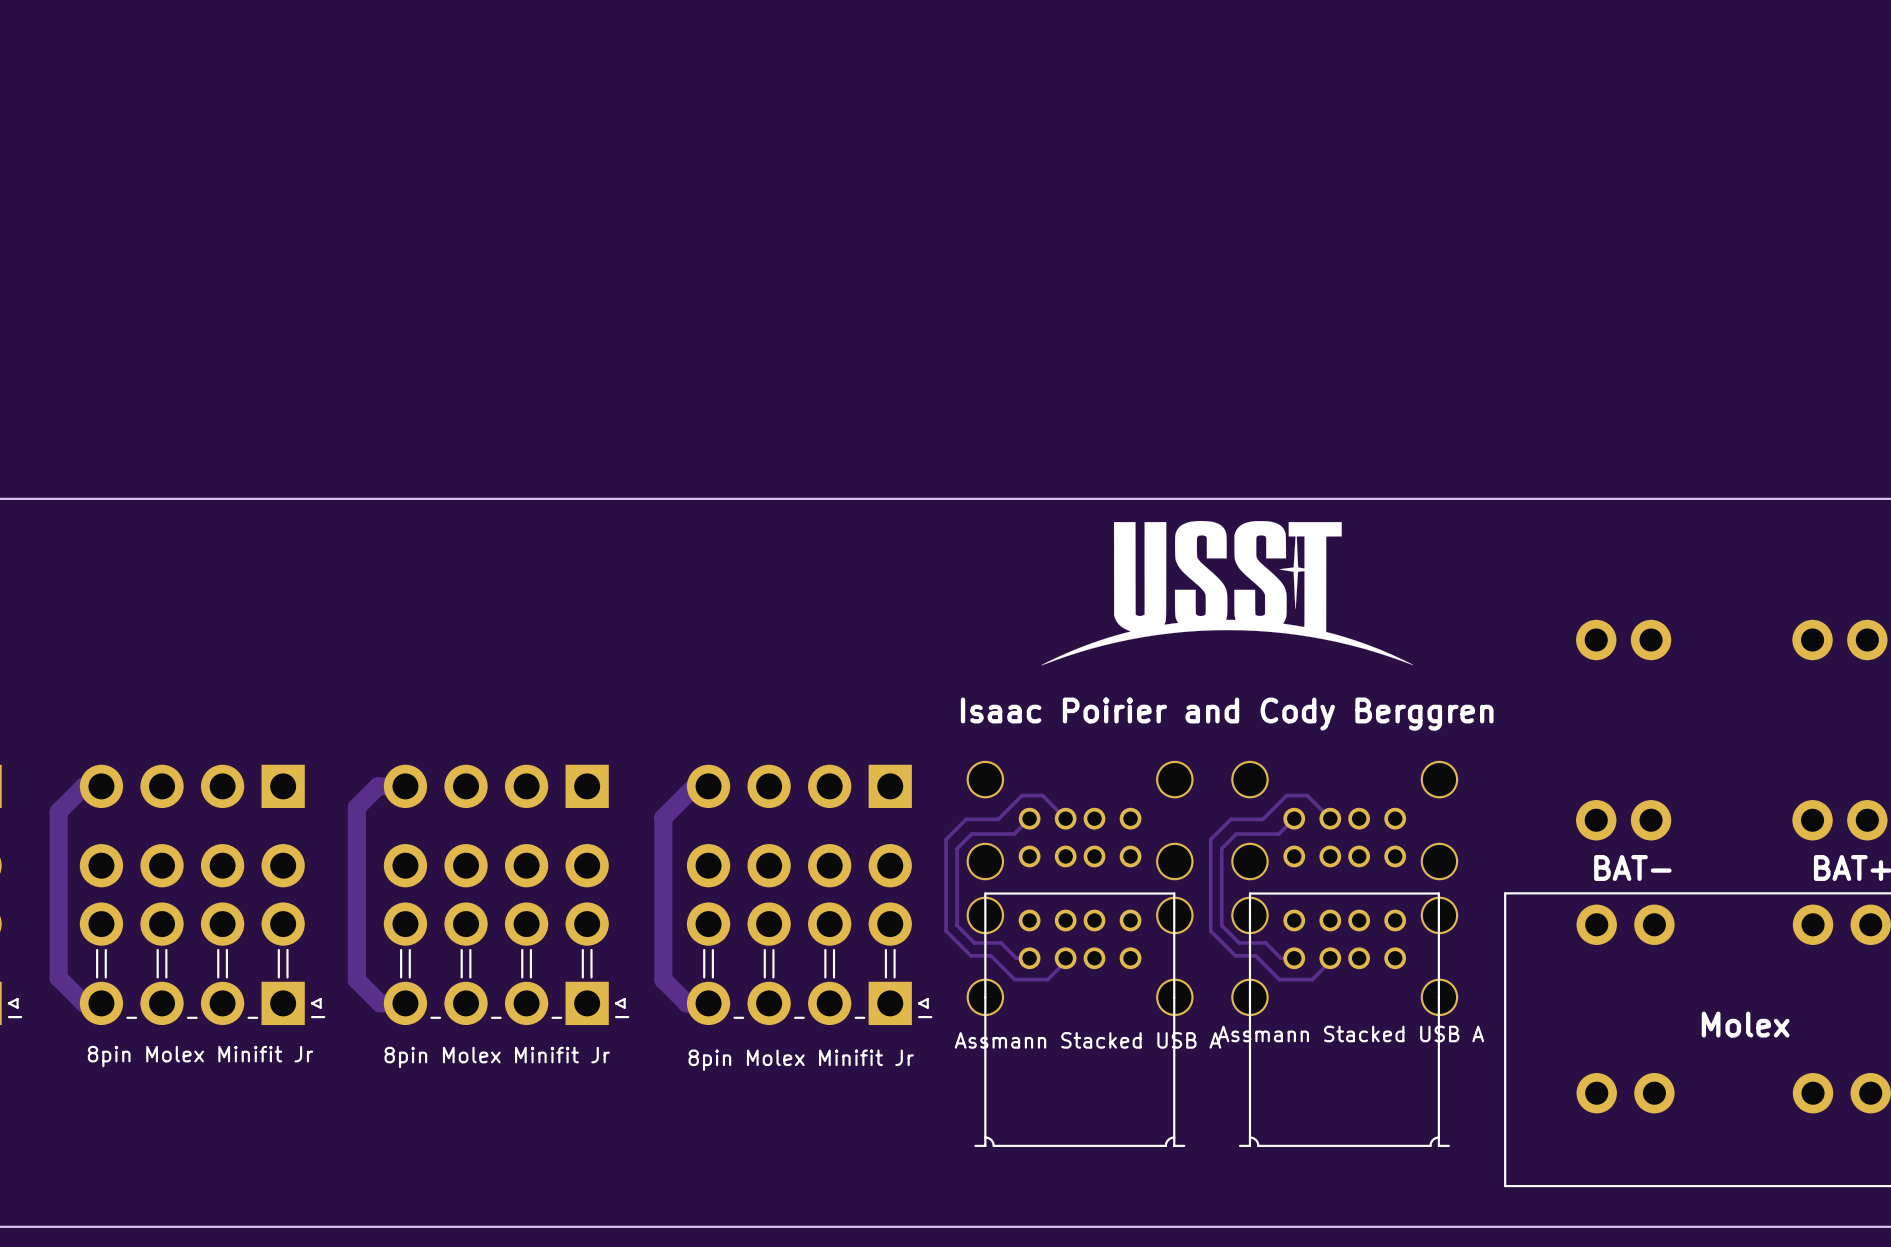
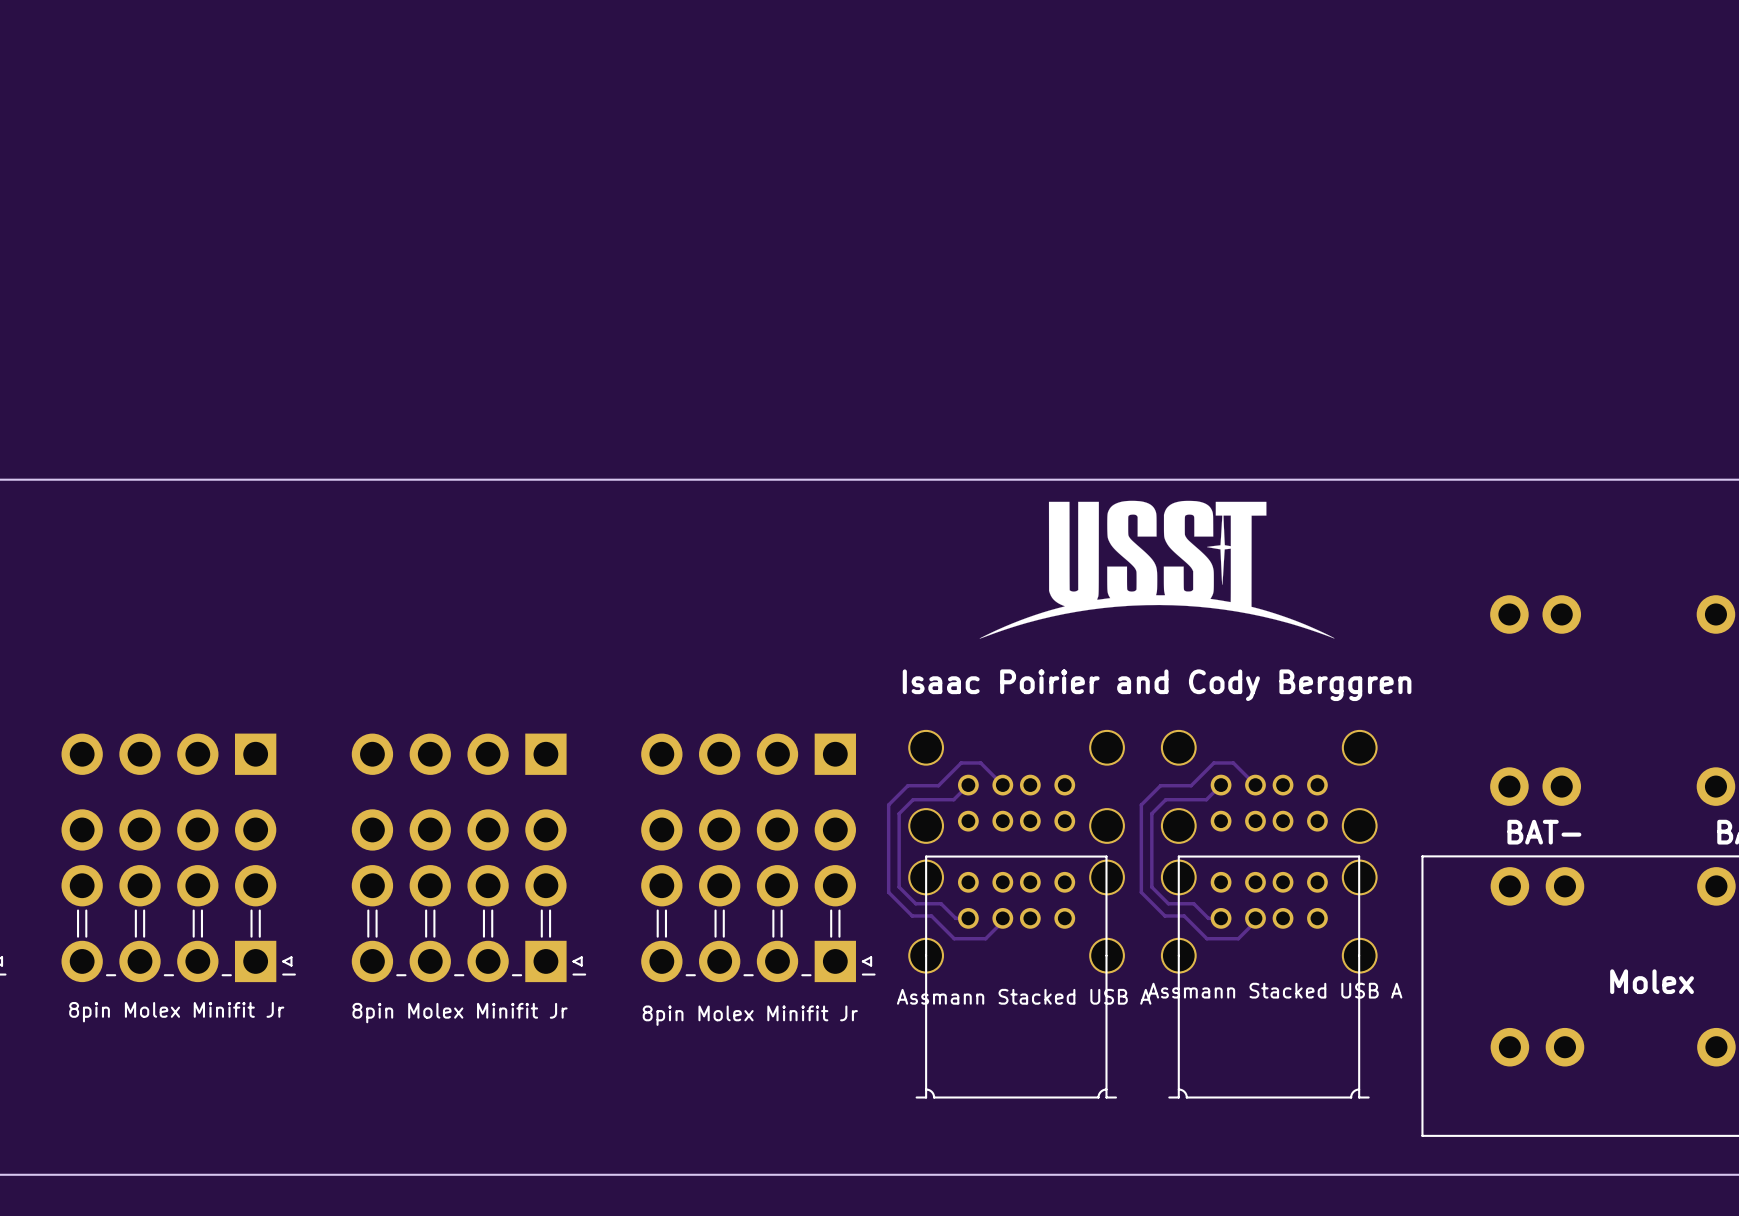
track: (101, 786) (84, 786) (58, 811) (58, 977) (84, 1003) (101, 1003) -> none
track: (404, 786) (377, 786) (356, 807) (356, 980) (379, 1003) (404, 1003) -> none
track: (708, 786) (694, 786) (663, 817) (663, 979) (686, 1003) (708, 1003) -> none

